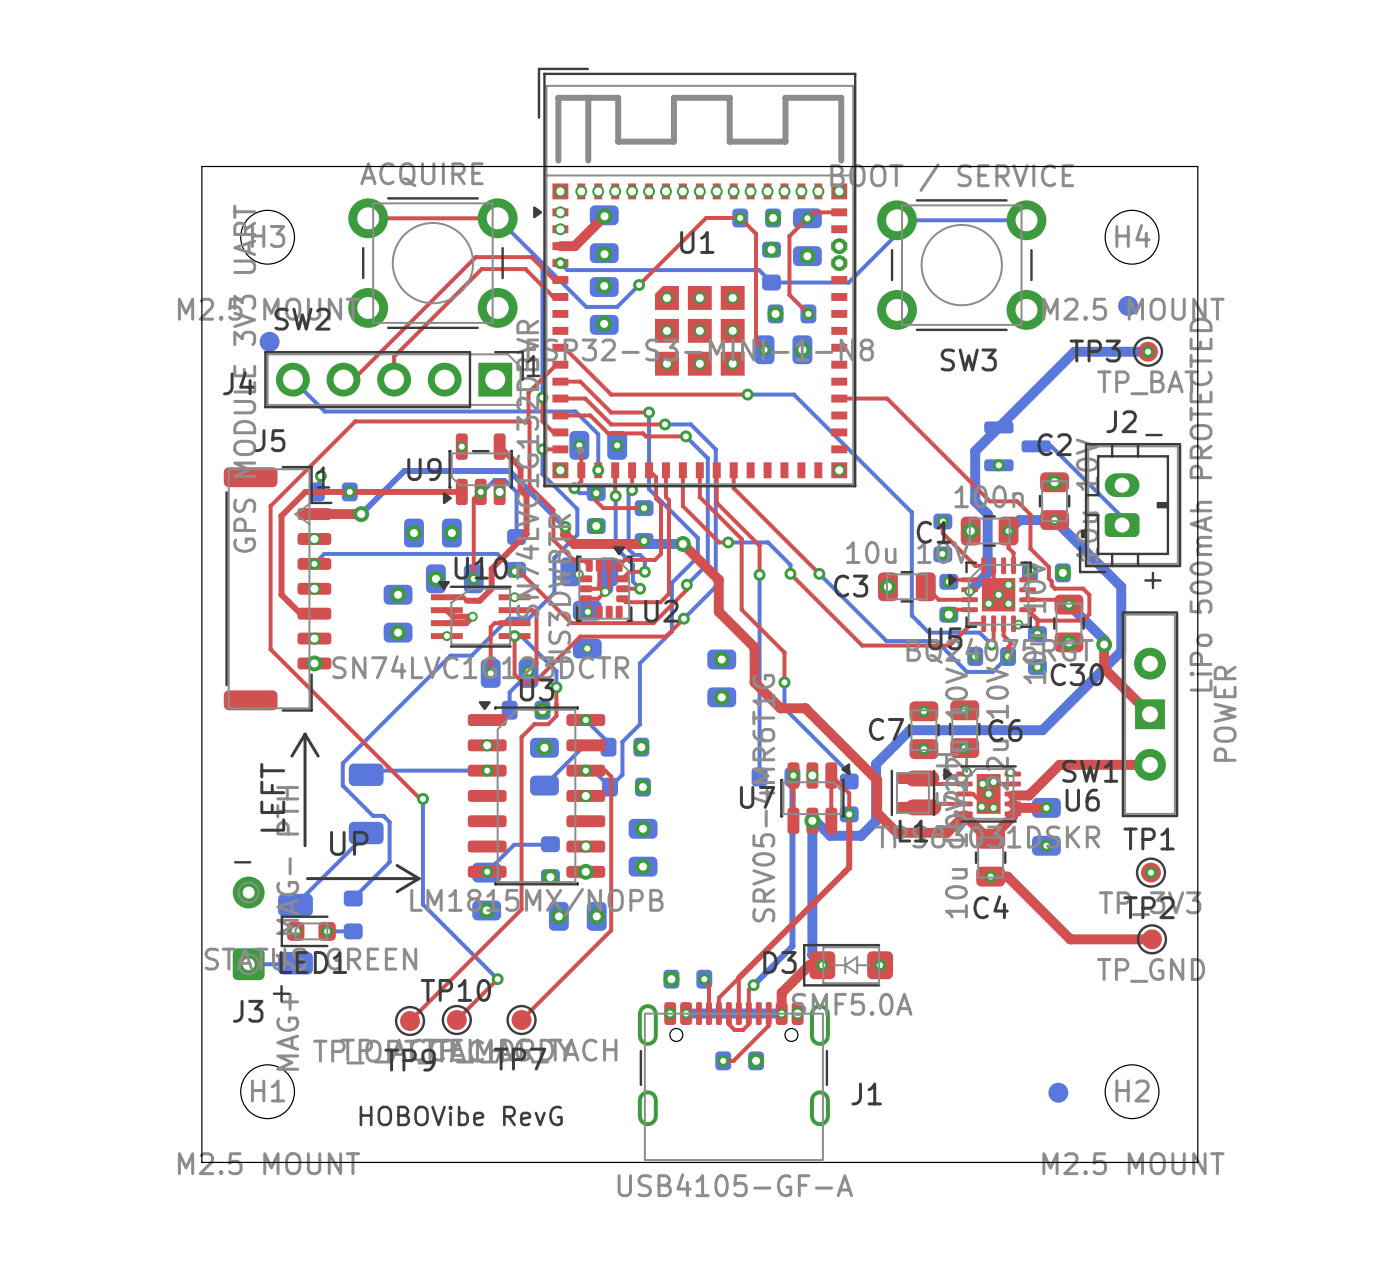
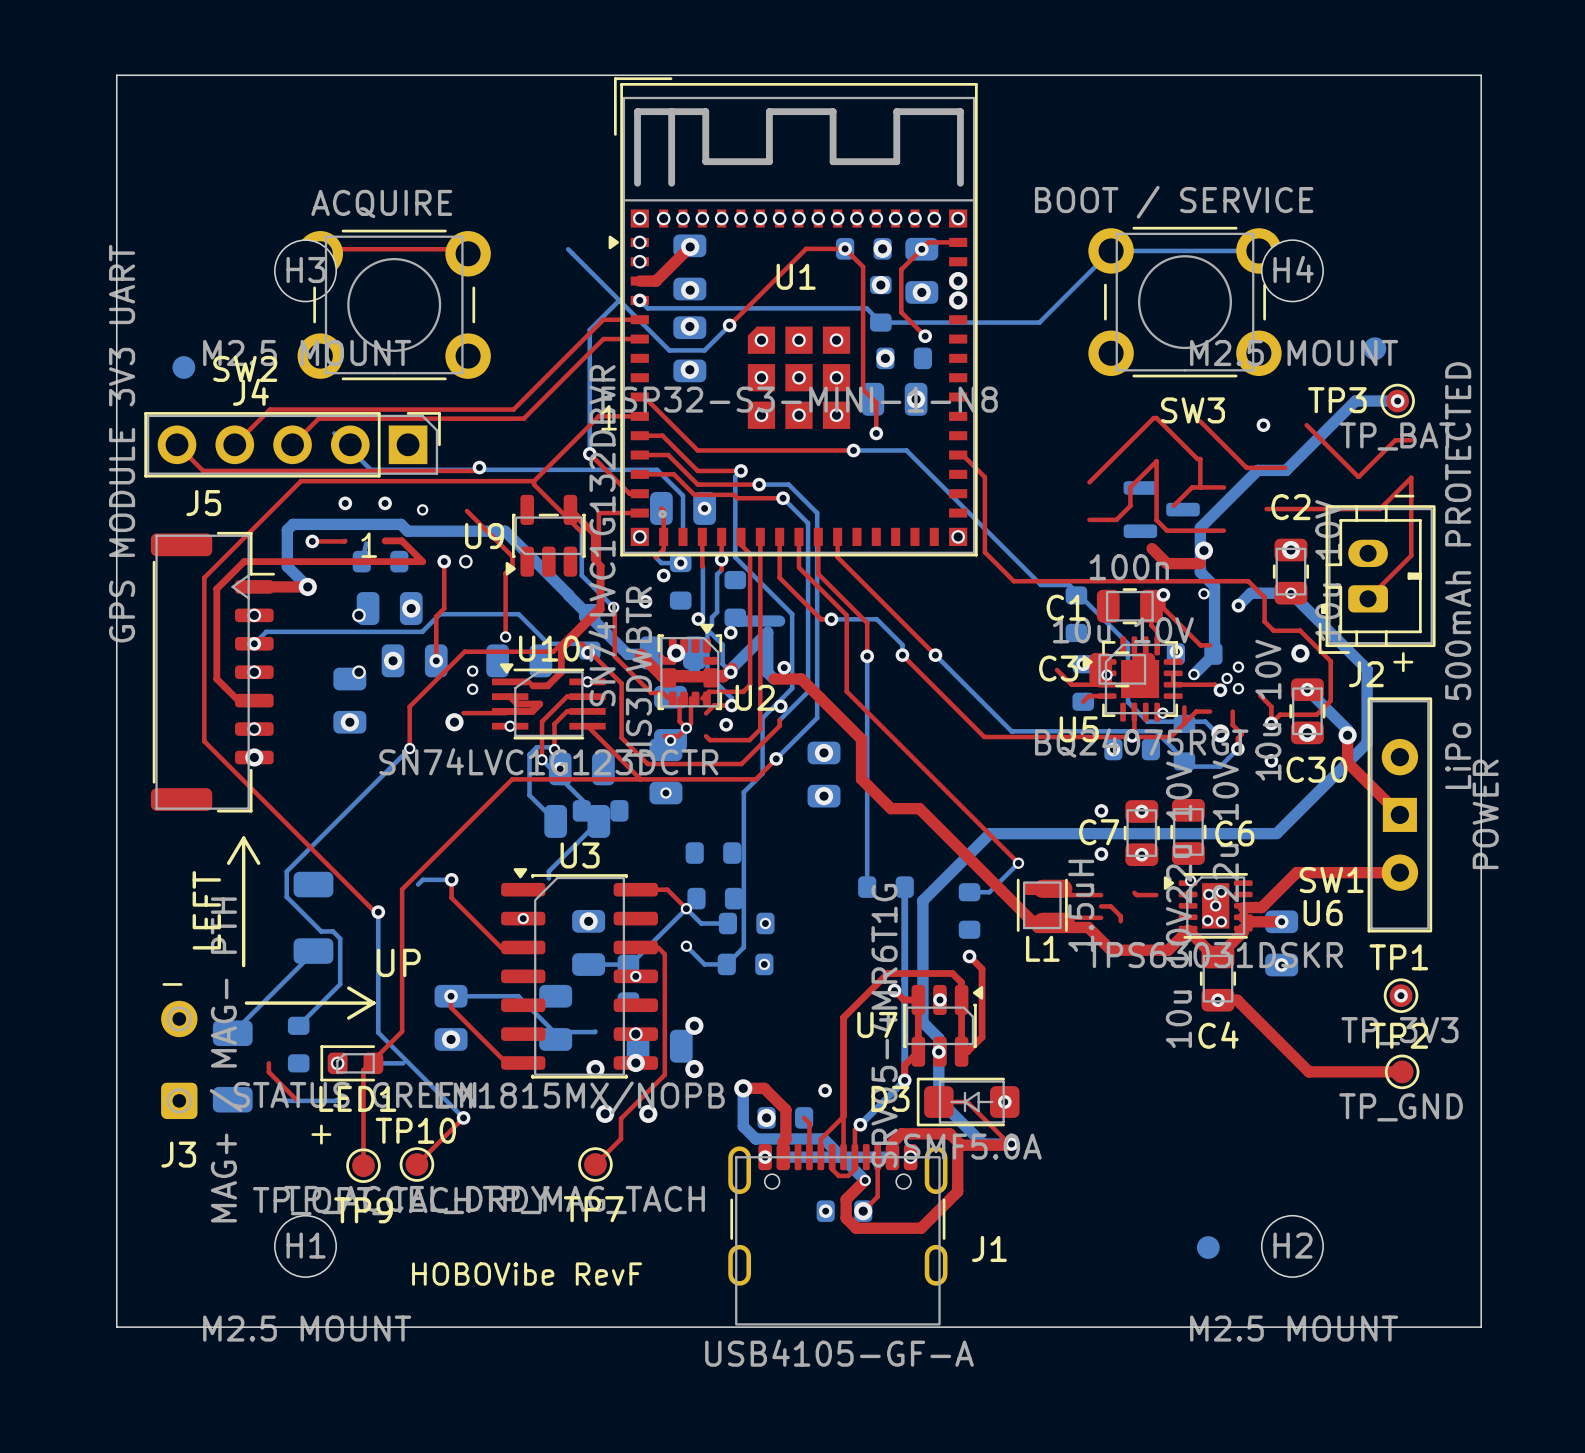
top track: (406, 218) (497, 218) -> (315, 249) (420, 249)
bottom track: (1026, 220) (897, 220) (897, 234) (848, 282) -> (1258, 250) (1111, 250) (1039, 322) (968, 322)
SW2 position: (432, 263) -> (394, 304)
bottom track: (542, 263) (542, 397) -> (619, 300) (589, 329) (589, 453)
SW3 position: (961, 265) -> (1185, 302)
top track: (789, 273) (789, 294) (808, 313) -> (901, 312) (925, 336)
top track: (554, 280) (531, 257) (475, 257) (353, 379) (343, 379) -> (632, 319) (603, 319) (513, 409) (270, 409) (234, 444)
top track: (553, 296) (525, 269) (481, 269) (394, 356) (394, 379) -> (631, 339) (603, 339) (523, 418) (318, 418) (292, 444)
part position: (1128, 305) -> (1374, 348)
via position: (808, 313) -> (925, 336)
part position: (269, 341) -> (183, 367)
top track: none -> (872, 399) (876, 402) (876, 433)
via position: (764, 349) -> (876, 433)
bottom track: (1147, 351) (1074, 351) (975, 451) (975, 501) (987, 514) (987, 573) (969, 591) -> none
TP3 position: (1147, 351) -> (1397, 401)
via: (1147, 351) -> none
bottom track: none -> (1397, 401) (1355, 401) (1286, 470) (1257, 470) (1200, 527) (1200, 572) (1214, 586) (1214, 653) (1193, 674)
via: none -> (1397, 401)
top track: (556, 364) (528, 392) (528, 421) -> (635, 416) (598, 416) (534, 481) (534, 484) (581, 532)
top track: none -> (1200, 421) (1246, 467) (1285, 467)
via: none -> (1263, 425)
top track: none -> (1306, 425) (1358, 476) (1395, 440) (1411, 440)
J4 position: (394, 379) -> (292, 444)
J4 name position: J4 (238, 383) -> J4 (250, 392)
top track: none -> (177, 444) (203, 470) (476, 470) (479, 467)
top track: (542, 397) (542, 421) (553, 432) -> (589, 453) (629, 493) (631, 493)
via position: (542, 397) -> (589, 453)
top track: (843, 398) (887, 398) (989, 501) (1017, 501) (1030, 514) (1030, 548) (1048, 567) (1048, 578) (1051, 581) (1051, 585) (1054, 588) (1083, 588) (1089, 594) (1089, 614) (1082, 620) (1038, 620) (1027, 609) -> (962, 455) (984, 477) (984, 552) (1013, 581) (1248, 581) (1264, 597) (1264, 621) (1273, 630) (1300, 630) (1330, 661) (1330, 700) (1316, 714) (1280, 714) (1271, 723) (1271, 706) (1260, 695)
via: none -> (479, 467)
bottom track: (649, 412) (649, 489) (697, 537) (697, 556) (671, 582) (671, 631) (639, 663) (639, 724) (622, 741) (622, 774) (610, 787) (593, 770) (585, 770) -> (740, 470) (735, 476) (735, 557) (792, 614) (792, 688) (762, 718) (762, 773) (743, 792) (743, 947) (726, 964) (704, 964) (686, 946)
top track: (355, 421) (270, 506) (270, 649) (420, 798) (422, 798) -> (405, 481) (300, 481) (204, 577) (204, 741) (375, 912) (378, 912)
top track: (467, 421) (528, 421) -> none
top track: (528, 421) (529, 486) (553, 510) (553, 539) (574, 560) (584, 560) (589, 565) -> none
J2 name position: J2 (1121, 421) -> J2 (1366, 674)
top track: none -> (1089, 482) (1153, 418) (1156, 418) (1197, 459) (1200, 459) (1200, 487)
top track: none -> (1223, 487) (1192, 487) (1173, 505)
text position: - (1153, 435) -> - (1404, 496)
via: none -> (345, 503)
via: none -> (385, 503)
via: (579, 445) -> none
top track: none -> (1266, 509) (1380, 509) (1411, 477) (1411, 555) (1368, 598)
via: none -> (422, 509)
via: (461, 446) -> none
bottom track: (1036, 446) (1051, 446) (1122, 517) (1122, 525) -> none
top track: none -> (466, 511) (512, 556) (512, 566) (505, 573) (505, 636)
top track: none -> (619, 513) (598, 513) (598, 606) (553, 651) (464, 651) (409, 706) (409, 748)
bottom track: (542, 449) (542, 474) (577, 509) (577, 534) (554, 557) (554, 592) (528, 618) (508, 618) (471, 655) (450, 655) (342, 763) (342, 785) (372, 815) (383, 815) (389, 822) (389, 862) (353, 898) -> none
via: (542, 449) -> none
top track: none -> (1089, 519) (1116, 519) (1130, 505) (1130, 487) (1156, 461) (1156, 520) (1167, 530) (1223, 530)
via: (998, 465) -> none
bottom track: none -> (581, 532) (581, 575) (613, 607)
via: (598, 470) -> none
top track: (649, 470) (656, 477) (656, 498) (660, 503) (660, 553) (655, 559) (624, 559) (619, 565) -> (740, 536) (740, 544) (750, 553) (750, 684) (743, 691) (708, 691) (702, 698)
top track: none -> (345, 540) (312, 541)
via: none -> (312, 541)
via: (320, 476) -> none
top track: none -> (1152, 548) (1167, 563) (1200, 563)
via: none -> (1290, 550)
via position: (574, 488) -> (663, 575)
top track: none -> (721, 559) (721, 569)
bottom track: (632, 490) (628, 493) (628, 549) (634, 554) (640, 554) (644, 559) (644, 571) -> none
top track: (305, 491) (281, 515) (281, 594) (300, 613) (314, 613) -> (348, 561) (244, 561) (216, 588) (216, 679) (238, 700) (254, 700)
via: (349, 491) -> none
top track: (370, 491) (461, 491) -> (422, 561) (401, 540) (385, 540)
top track: none -> (444, 561) (444, 608) (436, 616) (436, 660)
via: none -> (444, 561)
via: none -> (465, 561)
top track: (480, 491) (473, 498) (473, 578) -> none
bottom track: (480, 491) (494, 479) (504, 479) (516, 491) (516, 536) -> none
via: (480, 491) -> none
via: (499, 491) -> none
top track: (596, 493) (596, 501) (603, 508) (644, 508) -> none
via: (615, 496) -> none
top track: (665, 497) (668, 500) (668, 593) (660, 602) (625, 602) (622, 598) -> (760, 567) (760, 729) (749, 740) (710, 740) (706, 736)
bottom track: none -> (721, 569) (717, 574) (717, 612) (712, 617) (712, 624) (707, 629) (707, 673) (731, 698) (731, 705)
C2 position: (1054, 501) -> (1290, 571)
via: (644, 508) -> none
J2 position: (1130, 508) -> (1377, 579)
bottom track: (911, 512) (911, 615) (928, 632) (979, 632) (991, 644) -> (1041, 585) (1069, 585) (1128, 643) (1128, 702) (1147, 721) (1205, 721) (1219, 735)
bottom track: none -> (307, 586) (287, 566) (287, 530) (293, 524) (401, 524) (407, 531) (505, 531) (627, 654) (640, 654)
via: none -> (307, 586)
top track: (314, 514) (361, 514) -> (254, 586) (307, 586)
bottom track: (361, 514) (404, 471) (509, 471) (565, 527) -> none
via position: (361, 514) -> (411, 608)
via: none -> (1290, 593)
top track: (942, 521) (942, 533) (975, 565) (983, 565) -> (1163, 594) (1163, 608) (1200, 645) (1210, 645)
via: (942, 521) -> none
via position: (596, 526) -> (676, 653)
top track: (565, 527) (565, 535) (574, 543) (641, 543) (644, 540) -> none
via: none -> (1238, 605)
via: (970, 531) -> none
bottom track: (1008, 531) (1019, 520) (1054, 520) (1121, 586) (1121, 651) (1042, 730) -> (1238, 605) (1250, 593) (1290, 593) (1367, 669) (1367, 743) (1276, 833) (1190, 833)
via position: (1008, 531) -> (1163, 594)
top track: none -> (613, 607) (614, 656) (651, 692) (662, 692) (668, 698)
via: none -> (613, 607)
part: none -> (389, 608)
via: (414, 533) -> none
part: (432, 533) -> none
via: (451, 533) -> none
via: none -> (254, 615)
via: (644, 540) -> none
via: none -> (698, 619)
top track: (682, 543) (718, 579) (718, 611) -> (773, 679) (801, 679) (820, 698)
via: (682, 543) -> none
via: (942, 553) -> none
via: none -> (730, 632)
via: none -> (505, 636)
bottom track: none -> (254, 643) (266, 631) (422, 631) (439, 614) (518, 614) (548, 643) (581, 643)
via: none -> (254, 643)
bottom track: (314, 563) (324, 553) (497, 553) (515, 571) -> none
via: (314, 563) -> none
top track: none -> (581, 643) (621, 683) (621, 737) (647, 764) (741, 764) (779, 725) (779, 720)
bottom track: (707, 563) (686, 584) -> (808, 643) (808, 691) (779, 720)
top track: (599, 565) (599, 585) (605, 591) -> (679, 698) (679, 721) (686, 728)
top track: (609, 565) (609, 587) (598, 598) (586, 598) -> (690, 698) (690, 723) (678, 736) (664, 736)
top track: (519, 571) (571, 623) (653, 623) (686, 589) (686, 584) -> none
top track: (644, 571) (629, 571) (622, 578) -> (731, 705) (713, 705) (706, 713)
via: (644, 571) -> none
via: (1062, 572) -> none
via: none -> (1300, 653)
top track: none -> (640, 654) (662, 676) (723, 676) (731, 668)
via: (578, 574) -> none
via: none -> (393, 660)
part: none -> (414, 660)
via: none -> (436, 660)
via: (435, 578) -> none
via: (473, 578) -> none
text position: + (1152, 580) -> + (1403, 662)
via: (1008, 584) -> none
via: none -> (1238, 667)
bottom track: none -> (731, 668) (767, 632) (767, 672) (773, 679)
bottom track: (715, 586) (683, 618) -> (817, 669) (817, 717) (776, 758)
via: (887, 586) -> none
C3 position: (906, 586) -> (1122, 669)
via: none -> (472, 671)
via: none -> (254, 672)
J5 position: (278, 588) -> (212, 672)
via: none -> (1193, 674)
via: (605, 591) -> none
via: (398, 594) -> none
via: (998, 594) -> none
via: none -> (1227, 678)
via: none -> (472, 689)
via: (988, 603) -> none
via: (1008, 603) -> none
via: none -> (1238, 688)
bottom track: (1068, 604) (1104, 639) (1104, 644) -> (1307, 689) (1347, 729) (1347, 735)
via: none -> (1307, 689)
top track: (741, 605) (741, 609) (784, 652) (784, 682) -> (846, 691) (1018, 863)
top track: (514, 610) (532, 610) (536, 614) (536, 663) (528, 671) -> (587, 696) (567, 696) (542, 721) (542, 759)
via: (587, 611) -> none
part: none -> (349, 700)
part: (398, 613) -> none
via: (948, 614) -> none
via: (472, 616) -> none
via: none -> (731, 705)
top track: (683, 618) (665, 636) (580, 636) (533, 683) (523, 683) (514, 674) (514, 636) -> (640, 779) (587, 726)
top track: (496, 623) (490, 627) (490, 673) -> (567, 711) (554, 723) (554, 749)
top track: (983, 623) (971, 623) (949, 645) -> (1210, 711) (1196, 711) (1170, 737) (1084, 737)
top track: (1003, 623) (1003, 635) (1011, 643) (1008, 647) (1008, 656) -> (1232, 711) (1232, 725) (1241, 734) (1237, 738) (1237, 748)
C30 position: (1068, 623) -> (1307, 711)
top track: none -> (463, 713) (506, 713)
via: none -> (726, 724)
via: (1037, 634) -> none
bottom track: (514, 636) (521, 636) (556, 671) (556, 687) -> none
via: (514, 636) -> none
via: none -> (686, 728)
via: none -> (254, 729)
via: (314, 638) -> none
bottom track: (886, 641) (936, 641) (951, 656) -> (1012, 731) (1156, 731) (1173, 748)
via: none -> (1307, 732)
top track: (1104, 644) (1104, 668) (1149, 714) -> (1347, 735) (1347, 762) (1399, 814)
via position: (1104, 644) -> (1271, 723)
via: none -> (1347, 735)
bottom track: none -> (409, 748) (286, 871) (286, 896) (321, 931) (333, 931) (340, 938) (340, 984) (298, 1025)
via: none -> (409, 748)
bottom track: none -> (554, 749) (552, 747) (536, 747) (529, 754) (529, 795) (555, 821)
via: none -> (554, 749)
bottom track: (951, 656) (966, 671) (992, 671) (1008, 656) -> (1173, 748) (1190, 766) (1220, 766) (1237, 748)
via: (1008, 656) -> none
via: none -> (1237, 748)
via: none -> (254, 757)
via position: (314, 663) -> (349, 722)
top track: none -> (776, 758) (755, 779) (512, 779) (402, 889) (402, 1031) (363, 1070) (363, 1165)
via: none -> (776, 758)
bottom track: none -> (542, 759) (598, 816) (598, 821) (548, 871) (548, 878)
via: none -> (542, 759)
via: (1037, 666) -> none
via: none -> (1271, 760)
via: (528, 671) -> none
bottom track: (528, 673) (509, 692) (509, 710) -> none
part: none -> (665, 771)
bottom track: (784, 682) (784, 708) (849, 773) (849, 782) -> none
via: (784, 682) -> none
top track: (556, 687) (556, 716) (548, 724) (534, 724) (521, 737) (521, 909) (410, 1021) -> none
via: (556, 687) -> none
via: none -> (665, 793)
via: (542, 710) -> none
via: none -> (1141, 811)
via: (923, 711) -> none
SW1 position: (1149, 714) -> (1399, 814)
part: none -> (577, 821)
bottom track: (585, 720) (608, 742) (608, 747) (582, 747) (544, 785) -> none
via: (585, 720) -> none
C6 position: (964, 729) -> (1188, 831)
bottom track: (909, 730) (876, 764) (876, 820) (861, 835) (830, 835) (815, 820) (812, 820) (812, 955) (822, 965) -> (1038, 833) (990, 833) (922, 900) (922, 1022) (938, 1038) (938, 1099) (983, 1144) (1011, 1144)
C7 position: (923, 730) -> (1141, 833)
line: (305, 734) (291, 756) -> (243, 838) (228, 863)
line: (305, 734) (318, 756) -> (243, 838) (258, 863)
line: (305, 734) (305, 845) -> (243, 838) (243, 965)
via: (487, 745) -> none
via: (544, 747) -> none
via: (641, 747) -> none
via: none -> (1141, 854)
via: (923, 749) -> none
bottom track: none -> (1018, 863) (989, 892) (969, 892)
via: none -> (1018, 863)
top track: (1149, 764) (1059, 764) (1028, 795) (1012, 795) -> (1399, 872) (1296, 872) (1261, 907) (1243, 907)
part: (544, 766) -> none
top track: none -> (451, 879) (451, 898) (501, 947) (523, 947)
bottom track: (395, 770) (487, 770) -> none
via: none -> (451, 879)
via: (487, 770) -> none
top track: (585, 770) (605, 770) (611, 776) (611, 930) (543, 997) -> (657, 947) (664, 954) (664, 1074) (621, 1118) (621, 1138)
via: (585, 770) -> none
via: none -> (1190, 880)
via: (966, 772) -> none
via: (1010, 772) -> none
top track: (793, 775) (793, 820) -> none
via: (793, 775) -> none
via: (812, 775) -> none
top track: none -> (635, 889) (667, 889) (686, 908)
top track: (877, 780) (877, 812) (897, 832) (947, 832) (964, 815) (987, 838) (990, 838) (1012, 816) (1012, 813) -> (1001, 890) (1038, 927) (1088, 927) (1111, 950) (1168, 950) (1188, 930) (1214, 957) (1217, 957) (1243, 931) (1243, 928)
via: (993, 781) -> none
via: none -> (1221, 892)
via: (982, 783) -> none
via: none -> (1208, 894)
via: (642, 787) -> none
U3 position: (536, 793) -> (579, 973)
U6 position: (982, 793) -> (1208, 905)
via: (988, 793) -> none
via: none -> (1215, 905)
via: (585, 795) -> none
via: none -> (686, 908)
text position: LEFT (272, 797) -> LEFT (206, 910)
via: none -> (378, 912)
bottom track: (422, 798) (422, 904) (497, 979) -> (378, 912) (378, 1032) (463, 1117)
via: (422, 798) -> none
U7 position: (815, 798) -> (943, 1025)
part: none -> (313, 917)
part: (366, 803) -> none
top track: (1012, 803) (1016, 807) (1046, 807) -> (1243, 917) (1247, 921) (1281, 921)
via: none -> (523, 918)
via: (981, 806) -> none
via: none -> (1207, 920)
via: none -> (588, 921)
via: (993, 807) -> none
via: (1046, 807) -> none
via: none -> (1221, 921)
via: none -> (1281, 921)
bottom track: none -> (727, 923) (701, 923) (686, 908) (630, 964) (588, 964)
part: none -> (746, 923)
via: none -> (765, 923)
via position: (849, 814) -> (969, 956)
part footprint: [628, 818, 658, 877] -> [717, 953, 774, 976]
via: (812, 820) -> none
top track: (831, 820) (831, 775) (849, 793) (849, 867) (738, 977) -> (969, 956) (982, 968) (982, 1037) (967, 1051) (961, 1051) (961, 982) (952, 973) (887, 973) (843, 1017) (843, 1116)
part: none -> (588, 942)
part position: (1046, 826) -> (1281, 943)
via: none -> (686, 946)
via: (643, 828) -> none
bottom track: (366, 833) (295, 904) -> (313, 951) (232, 1033)
bottom track: (550, 844) (514, 844) (487, 871) -> none
via: none -> (764, 964)
via: (1046, 845) -> none
via: none -> (1281, 964)
via: (585, 846) -> none
via: none -> (635, 976)
C4 position: (990, 857) -> (1217, 978)
text position: - (242, 862) -> - (172, 984)
line: none -> (348, 988) (373, 1003) (348, 1018)
line: (397, 865) (418, 878) -> none
via: (643, 866) -> none
top track: none -> (894, 990) (903, 999) (918, 999) (918, 1051) (904, 1065) (904, 1080)
via: none -> (894, 990)
bottom track: none -> (454, 993) (451, 996) (518, 996) (554, 1032) (595, 1031)
via: (487, 871) -> none
via: (585, 871) -> none
top track: none -> (451, 996) (451, 1007) (506, 1063) (523, 1063)
via: none -> (451, 996)
TP1 position: (1150, 872) -> (1401, 995)
via: (1150, 872) -> none
via: none -> (1401, 995)
via: none -> (939, 999)
top track: (990, 876) (1007, 876) (1070, 939) (1151, 939) -> (1217, 1000) (1237, 1000) (1308, 1071) (1402, 1071)
via: (990, 876) -> none
via: none -> (1217, 1000)
via: (550, 877) -> none
line: (327, 878) (418, 878) -> (246, 1003) (350, 1003)
line: (418, 878) (397, 891) -> none
part: none -> (451, 1017)
via: none -> (694, 1025)
via: none -> (635, 1034)
via: none -> (451, 1039)
via: (486, 910) -> none
part position: (353, 914) -> (298, 1044)
via position: (558, 916) -> (635, 1063)
via: (596, 916) -> none
via: none -> (938, 1051)
J3 position: (248, 928) -> (179, 1059)
top track: none -> (268, 1063) (268, 1072) (296, 1099)
via: (327, 931) -> none
part: none -> (232, 1066)
part: (295, 934) -> none
via: none -> (595, 1069)
via: none -> (694, 1069)
TP2 position: (1151, 939) -> (1402, 1071)
via: none -> (904, 1080)
top track: none -> (743, 1088) (764, 1088) (785, 1109) (785, 1139) (783, 1141) (783, 1157)
bottom track: none -> (743, 1088) (743, 1126) (755, 1138) (823, 1138) (865, 1180)
via: none -> (743, 1088)
top track: (822, 965) (809, 965) (781, 992) (781, 1001) -> (961, 1145) (949, 1133) (901, 1133) (892, 1142)
top track: none -> (938, 1102) (967, 1102) (1010, 1145)
via: (822, 965) -> none
via: none -> (605, 1113)
via: none -> (648, 1113)
via: none -> (463, 1117)
top track: (497, 979) (456, 1020) -> (463, 1117) (416, 1164)
via: (497, 979) -> none
via position: (704, 979) -> (825, 1090)
via: none -> (1011, 1144)
top track: none -> (961, 1145) (1010, 1145)
top track: none -> (961, 1145) (957, 1148) (957, 1191) (921, 1228) (856, 1228) (846, 1218) (846, 1199) (865, 1180)
via: (686, 1013) -> none
via position: (781, 1013) -> (865, 1180)
TP10 position: (456, 1020) -> (416, 1164)
TP9 position: (410, 1021) -> (363, 1165)
top track: (768, 1025) (733, 1060) (723, 1060) -> (877, 1170) (877, 1196) (863, 1211)
text: HOBOVibe RevG (461, 1115) -> HOBOVibe RevF (527, 1274)
board edge: (201, 1162) (201, 166) (1197, 166) (1197, 1162) -> (230, 1327) (116, 1327) (116, 75) (1481, 75) (1481, 1327) (1367, 1327)

